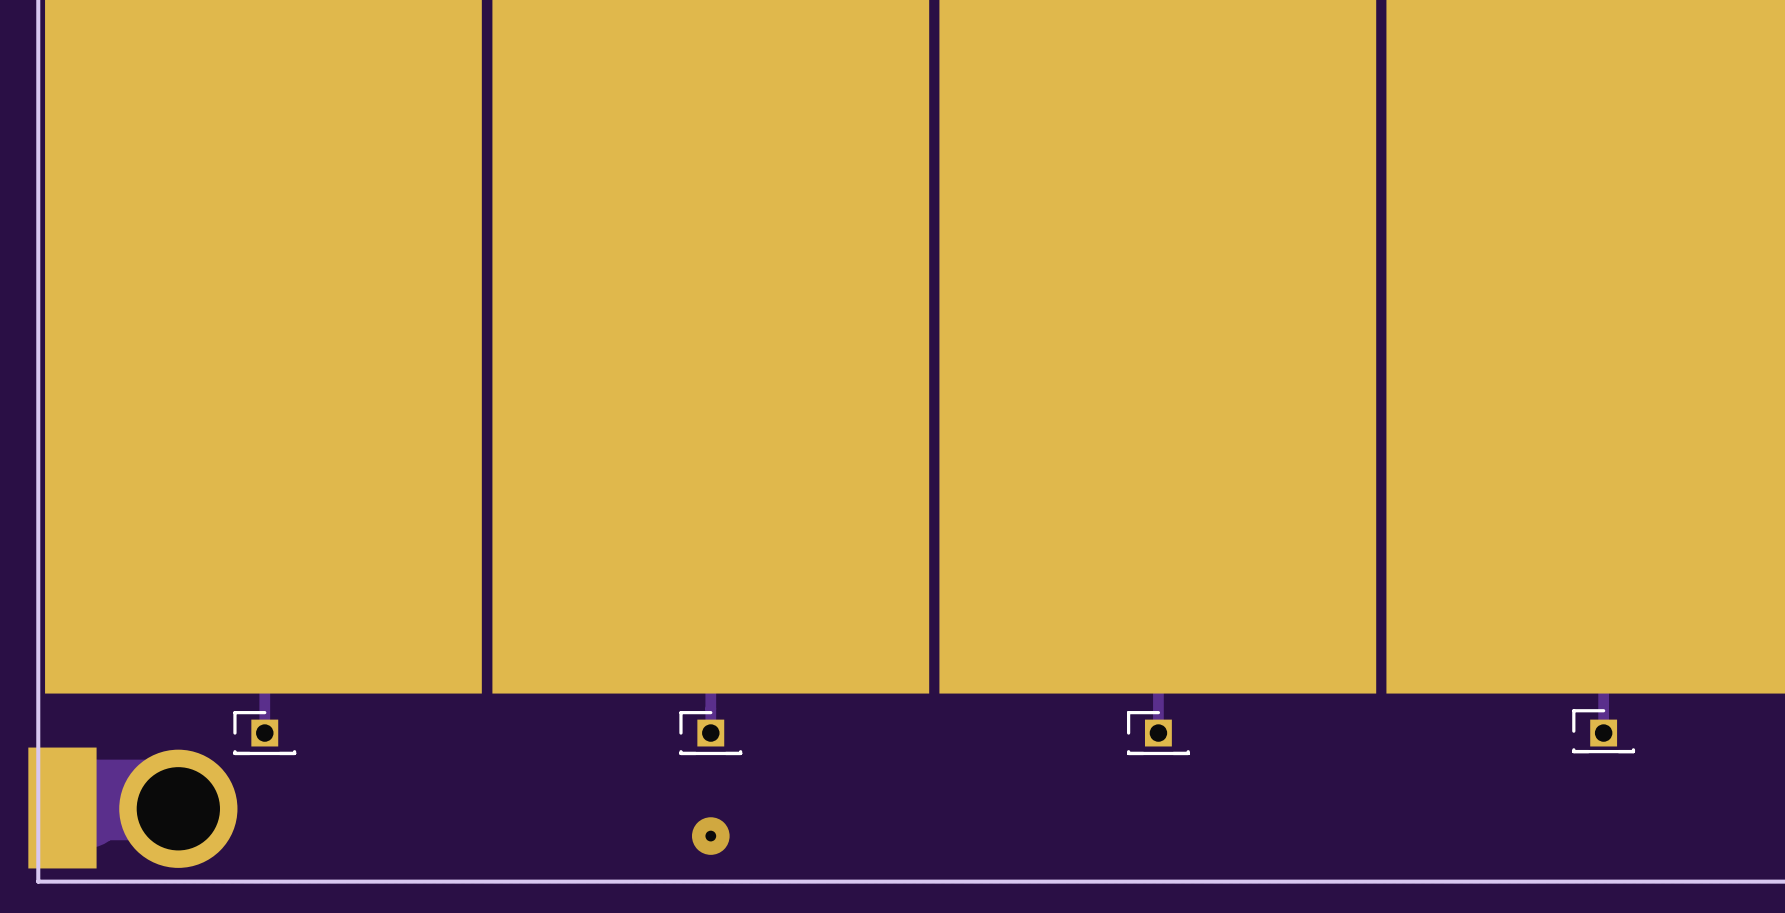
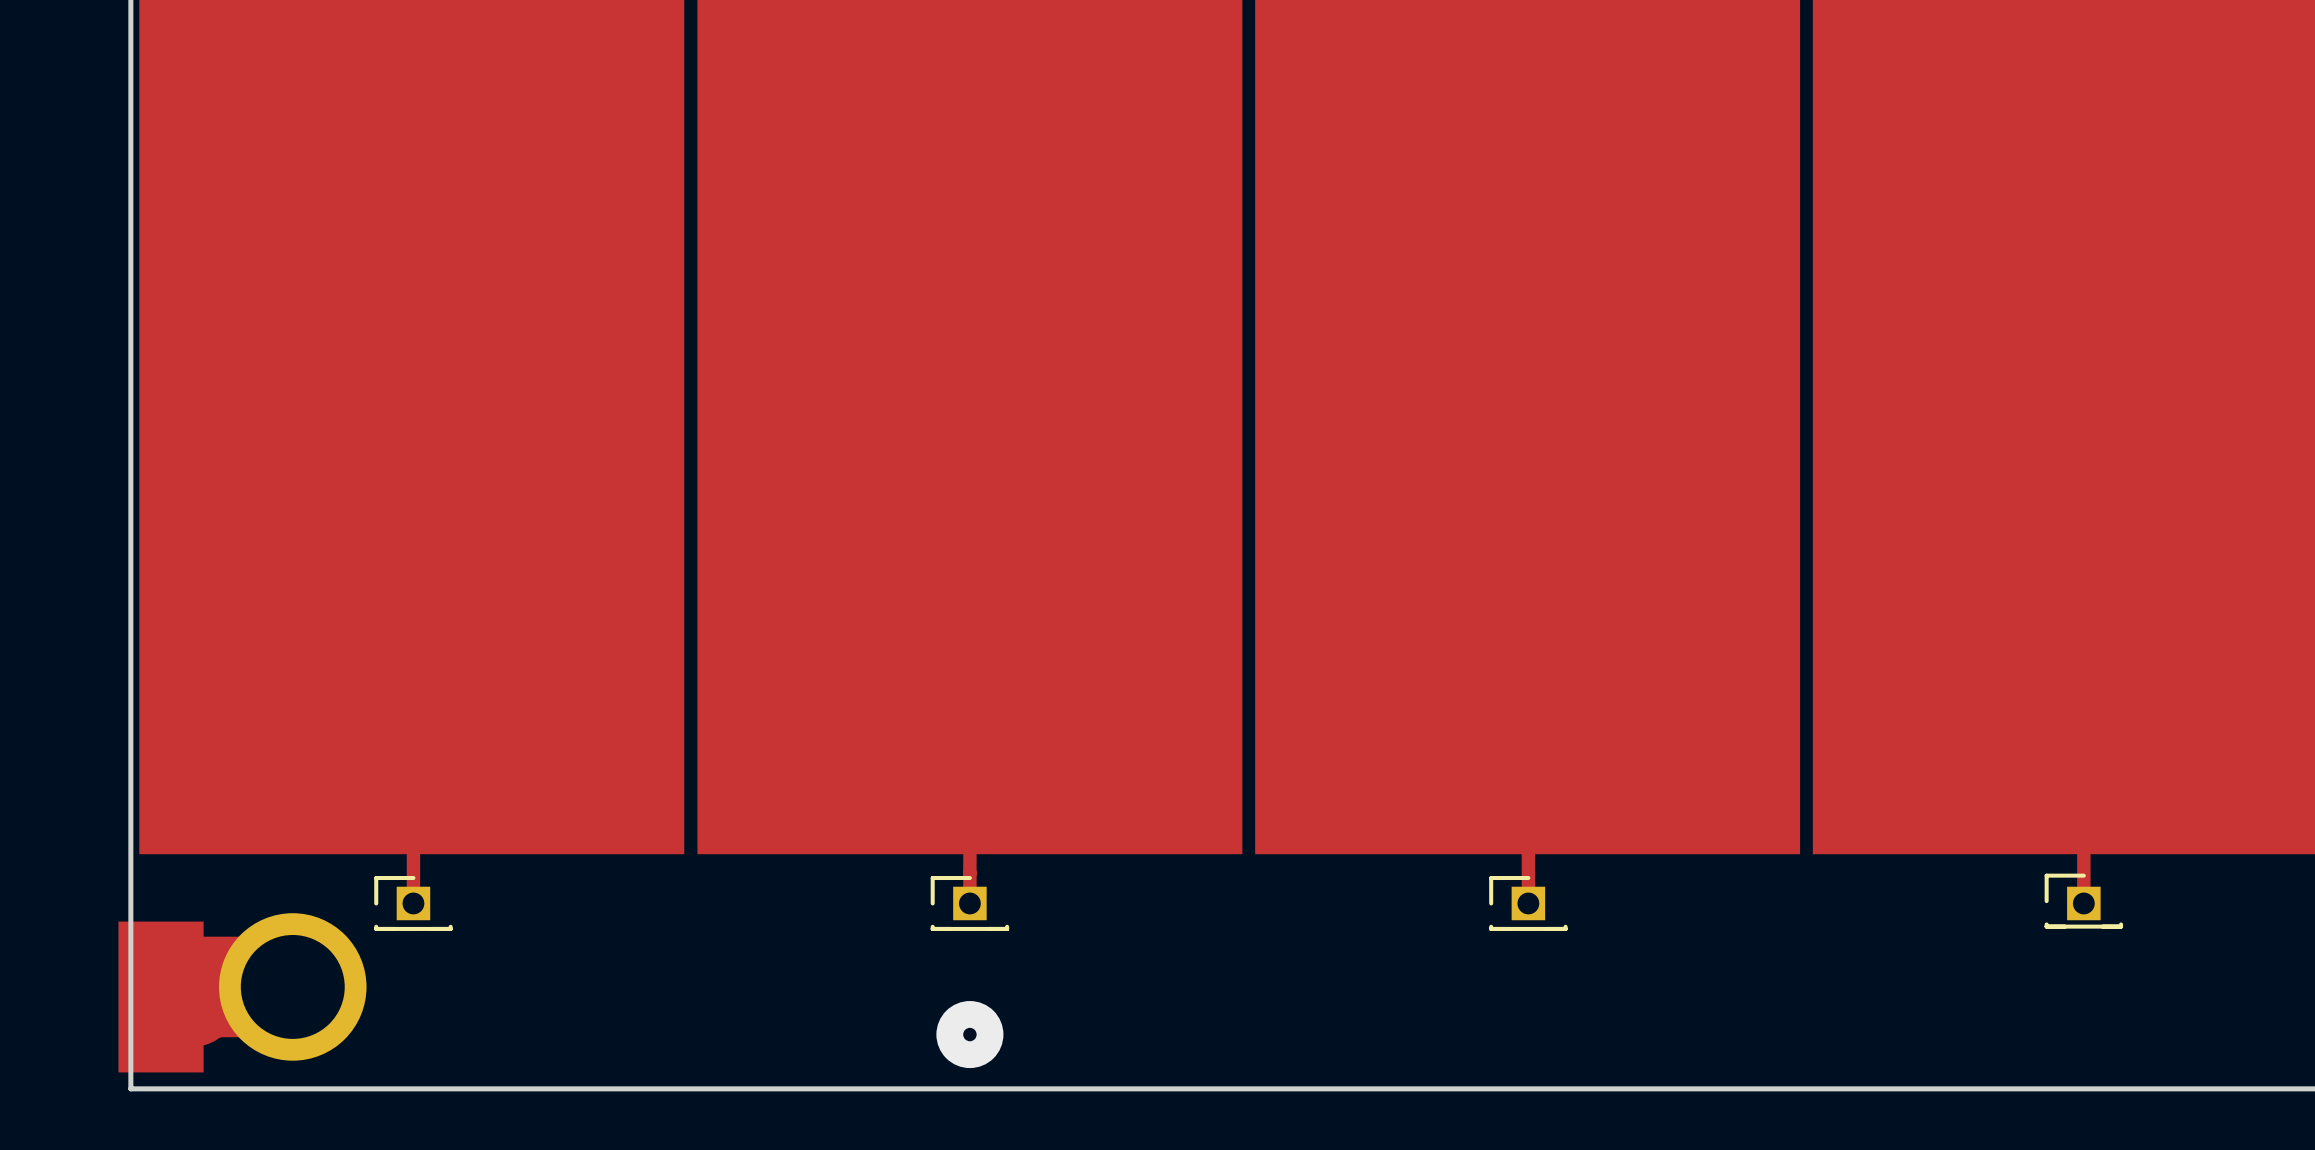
part position: (178, 808) -> (292, 986)
via size: [691, 817, 730, 855] -> [936, 1001, 1004, 1069]

